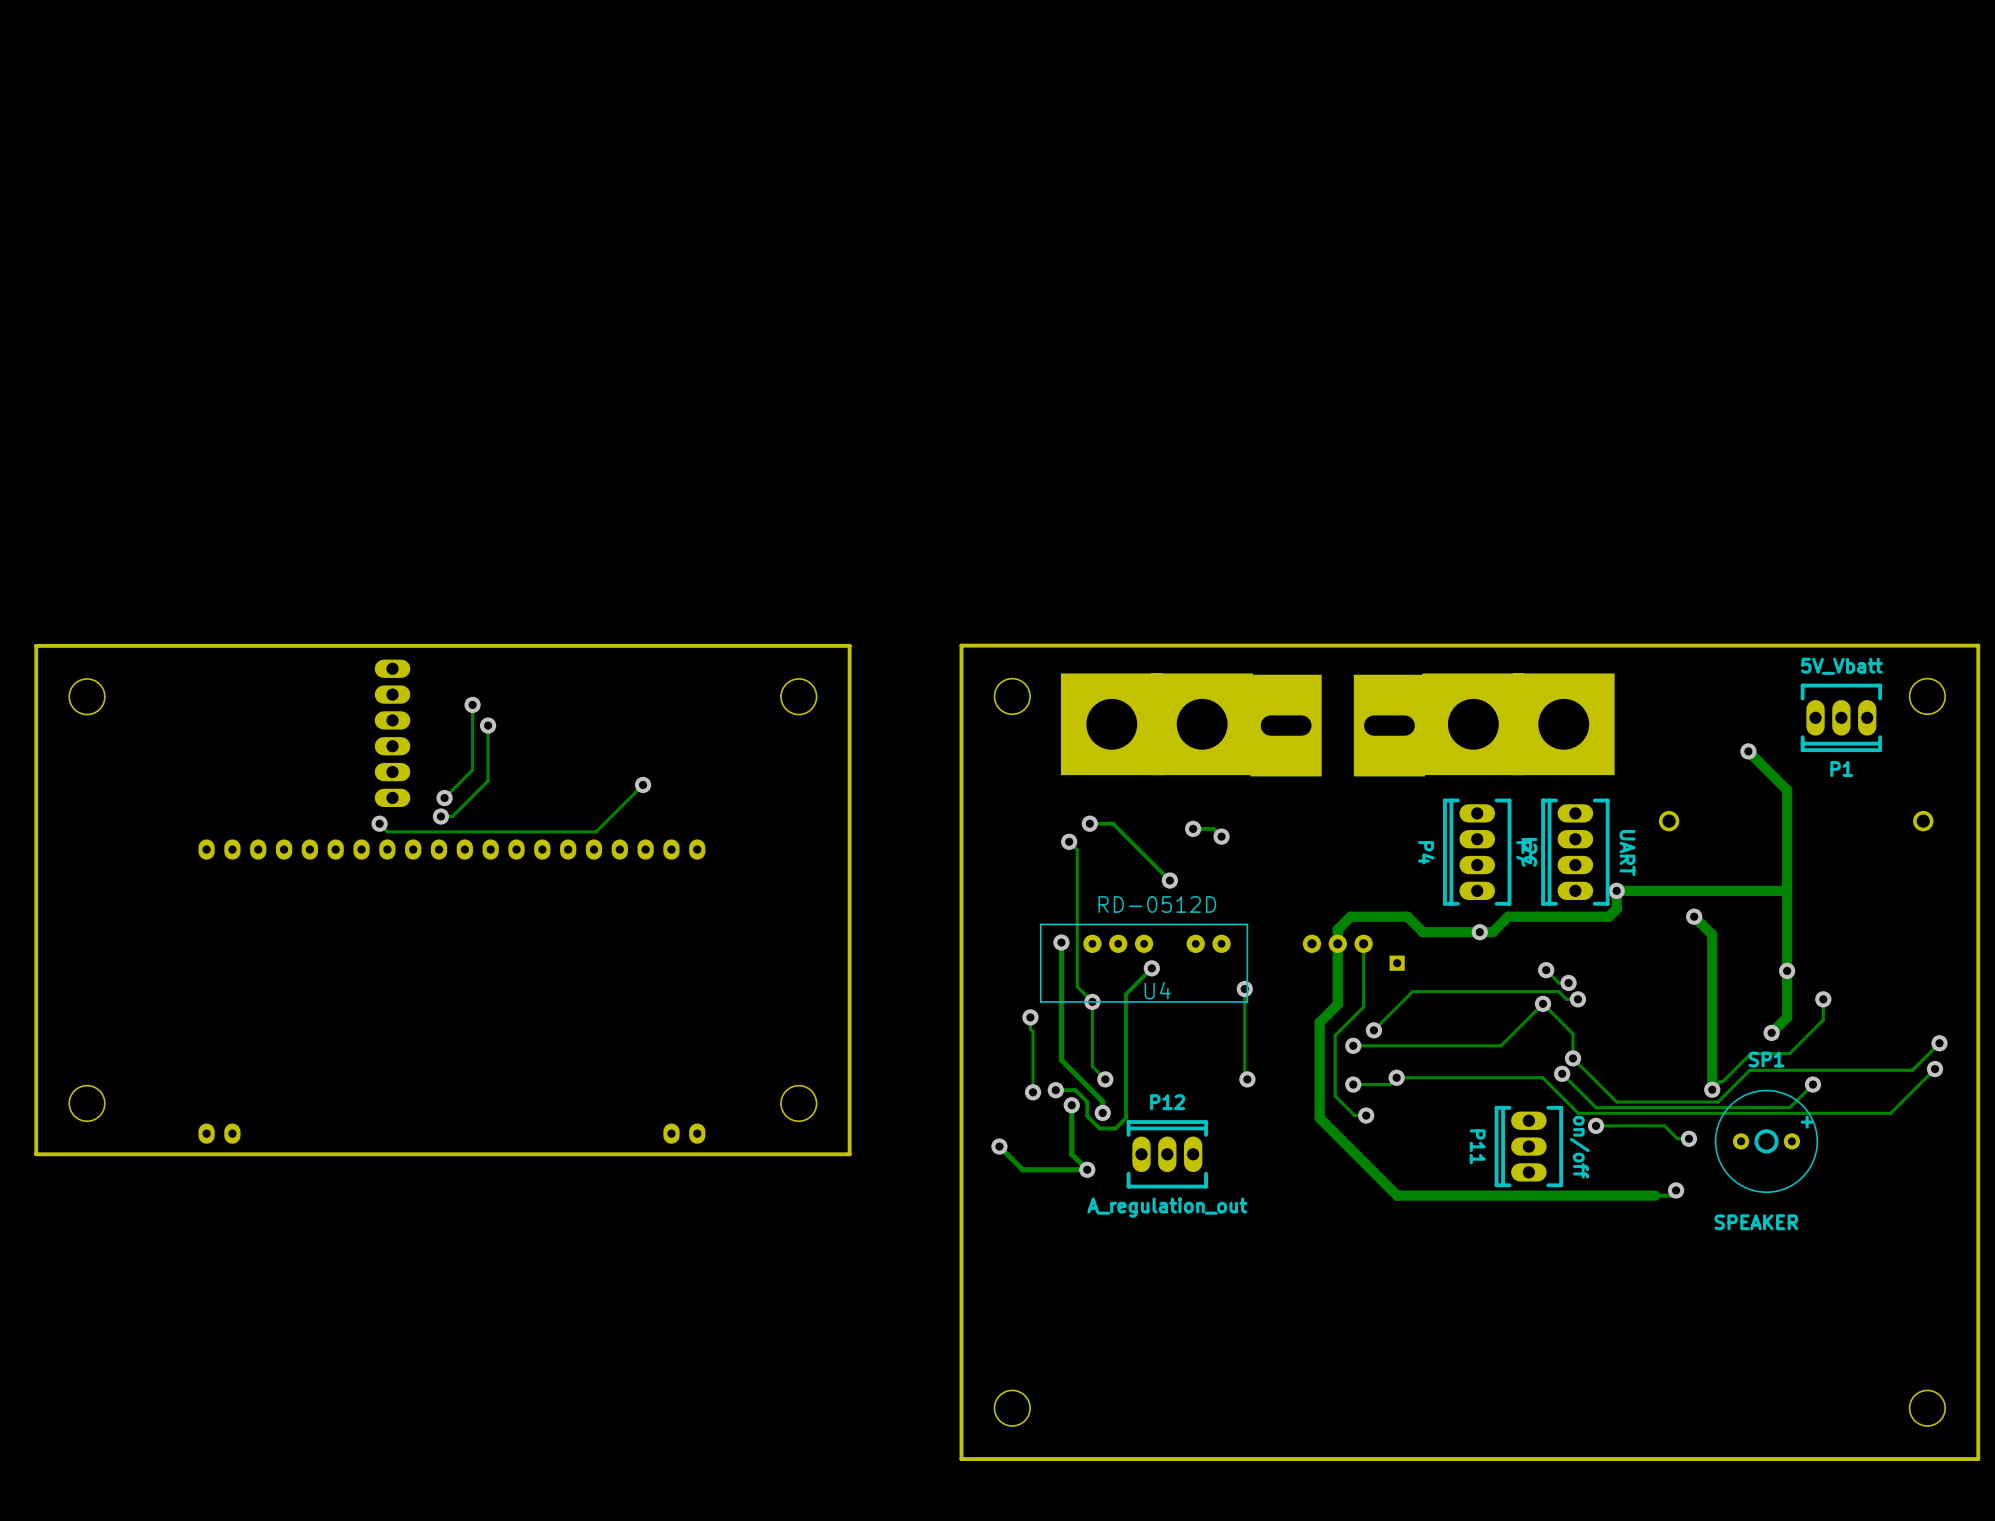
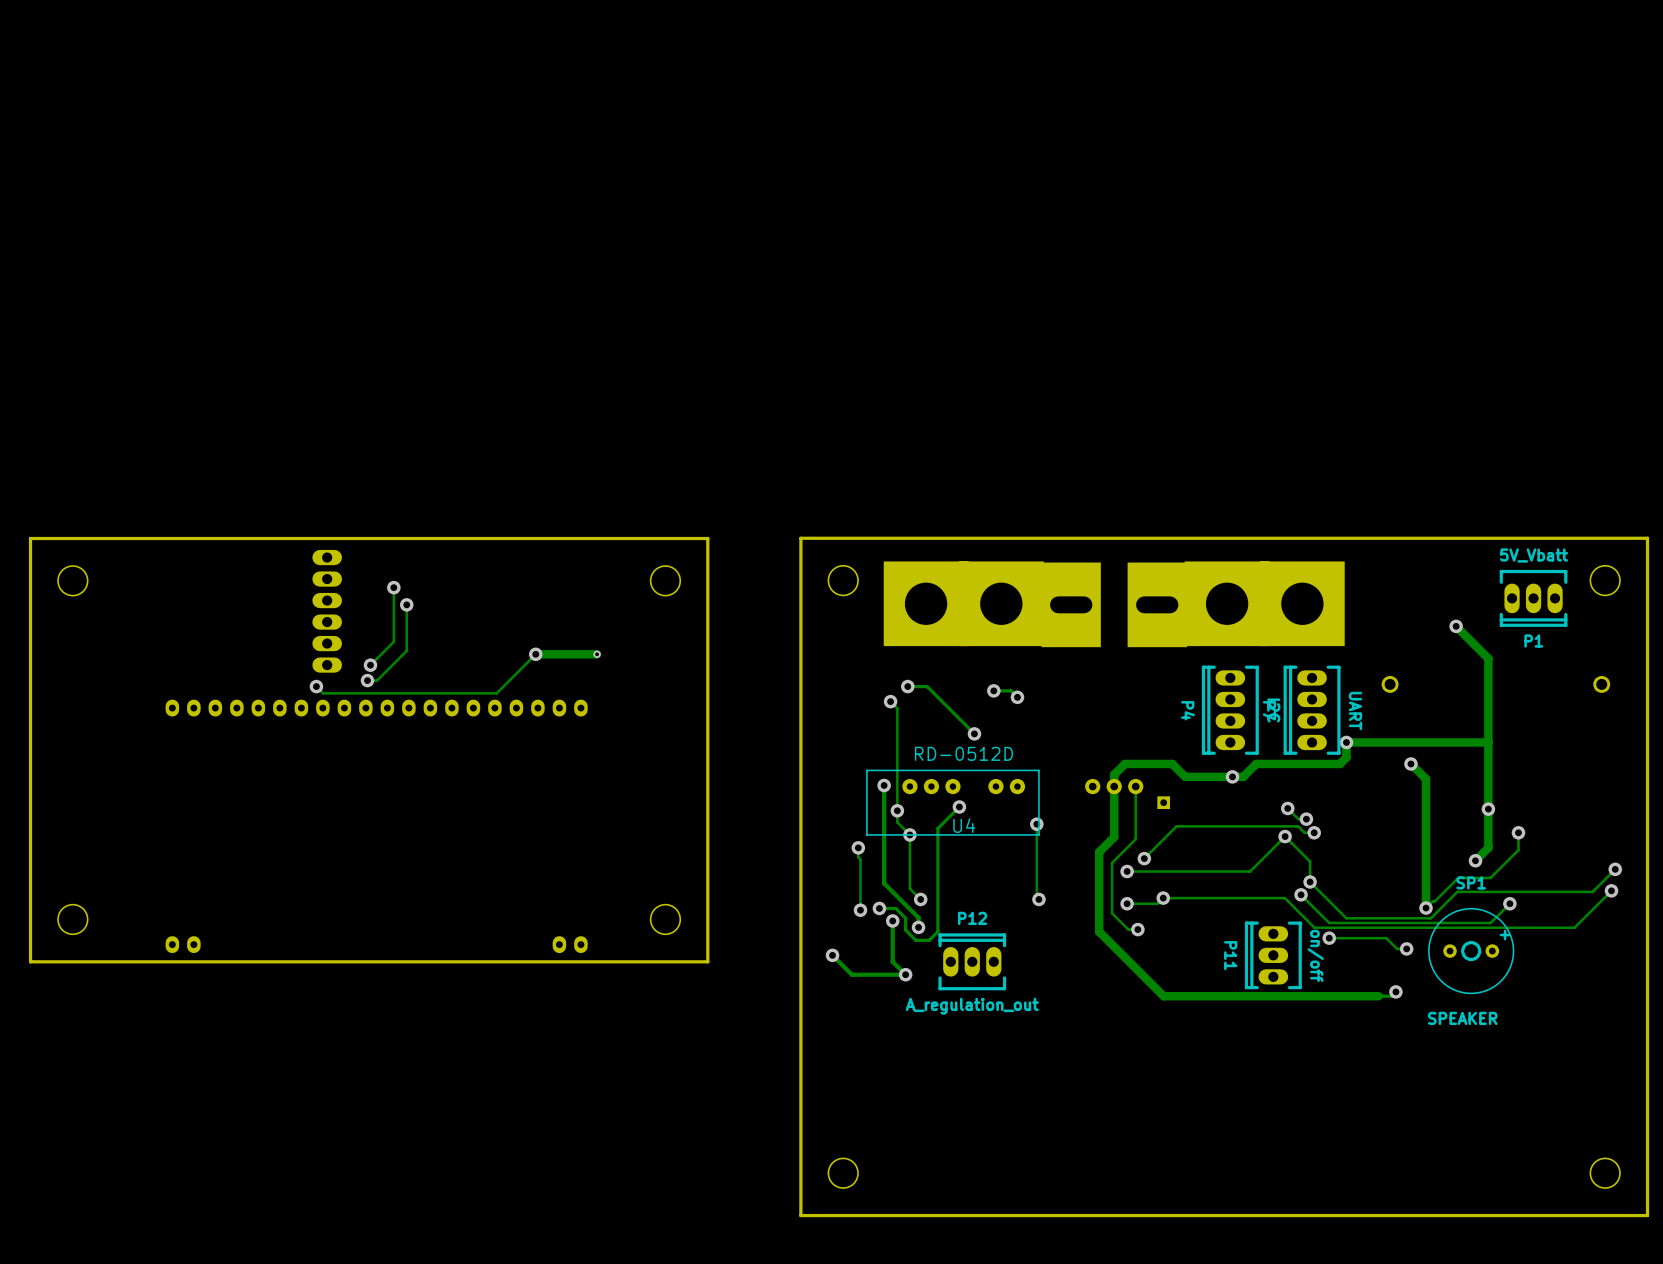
track: none -> (597, 654) (535, 654)
via: none -> (597, 654)
via: none -> (897, 810)

